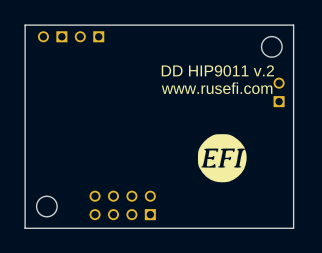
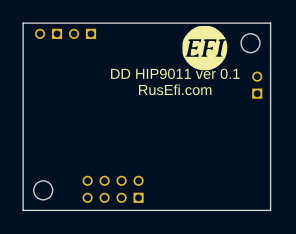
text: DD HIP9011 v.2 (217, 70) -> DD HIP9011 ver 0.1 (175, 73)
text: www.rusefi.com (217, 88) -> RusEfi.com (175, 89)
drawing position: (222, 158) -> (204, 48)

